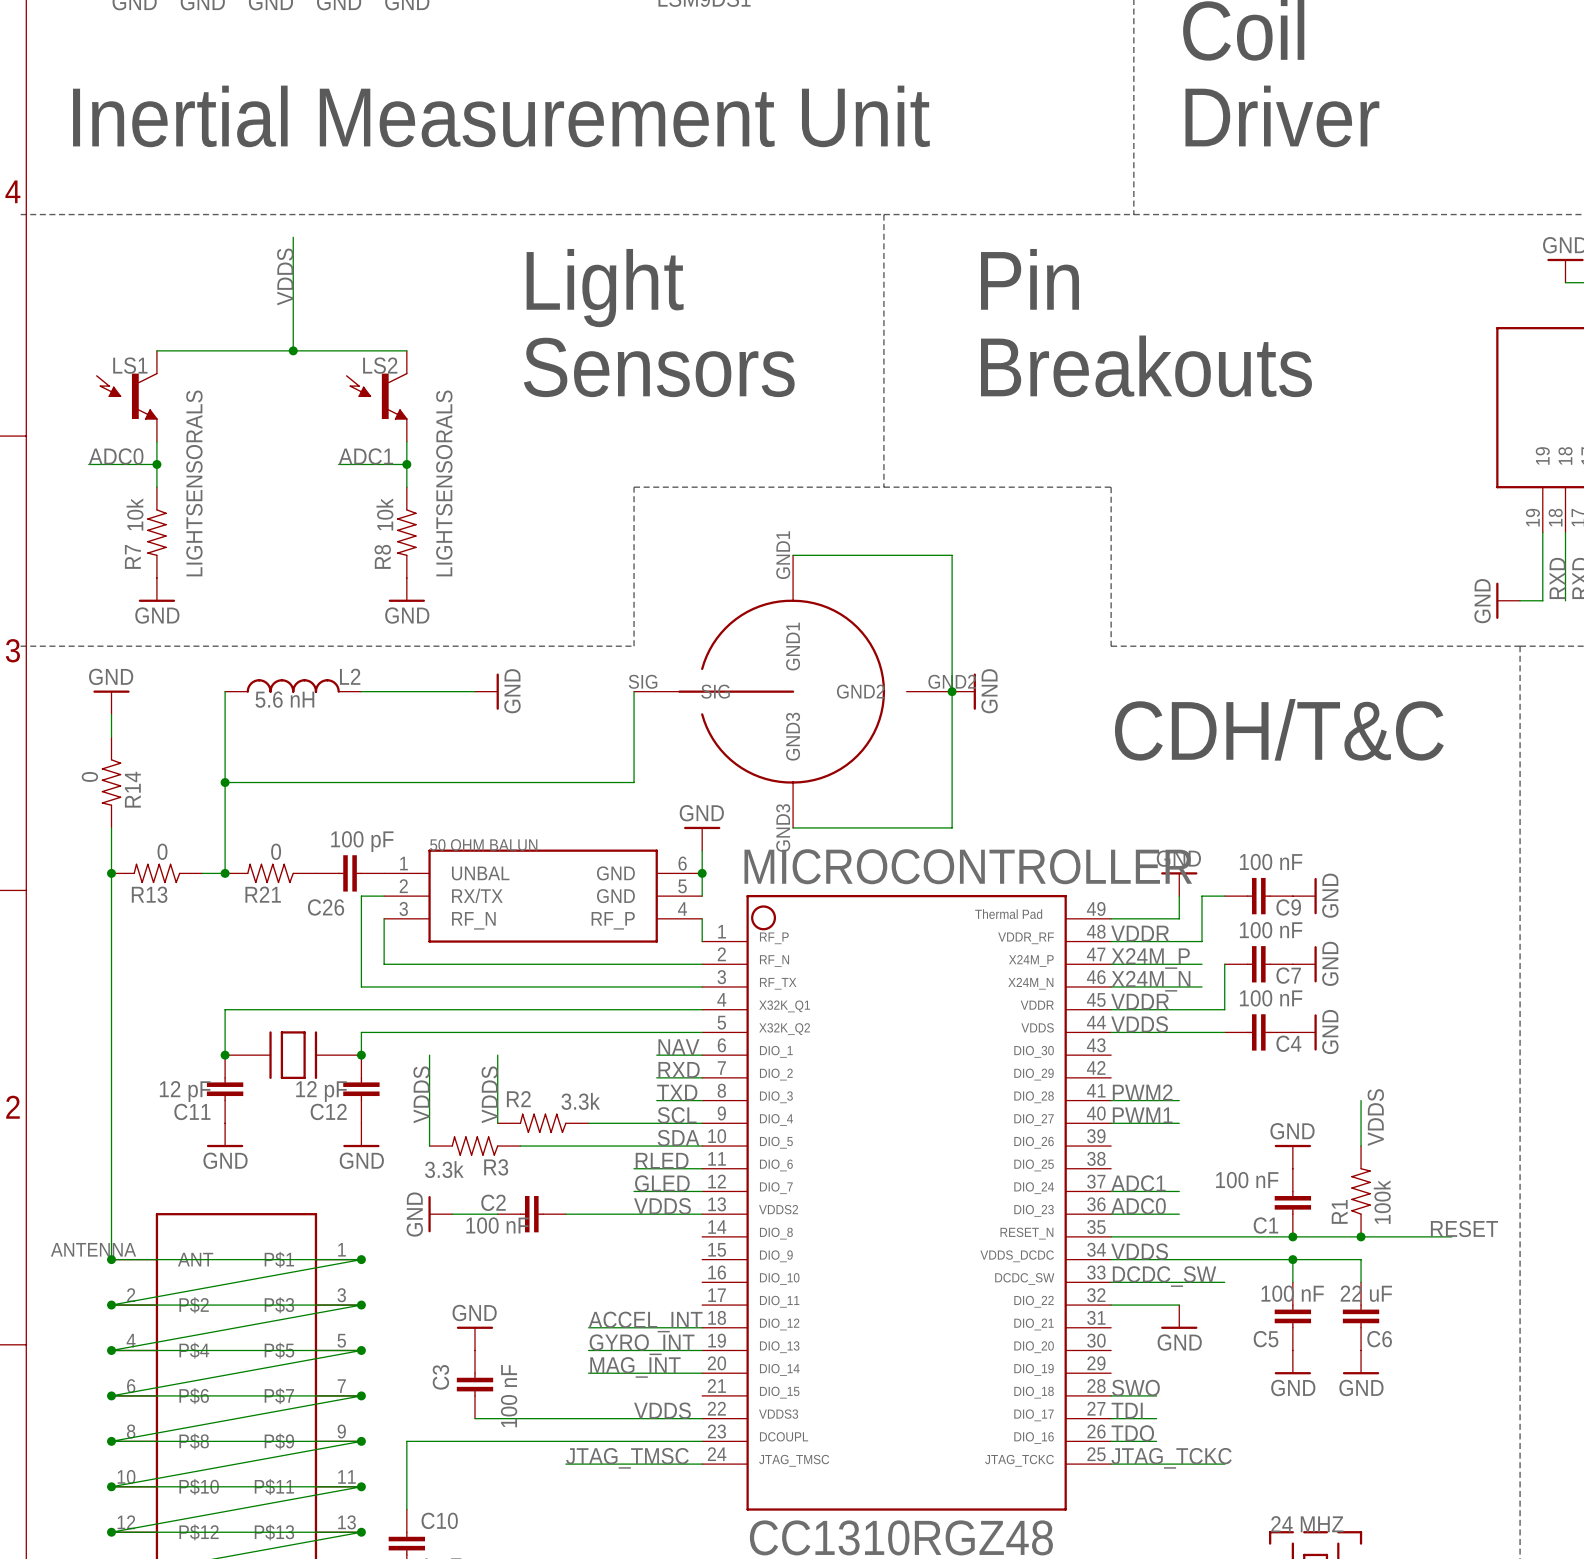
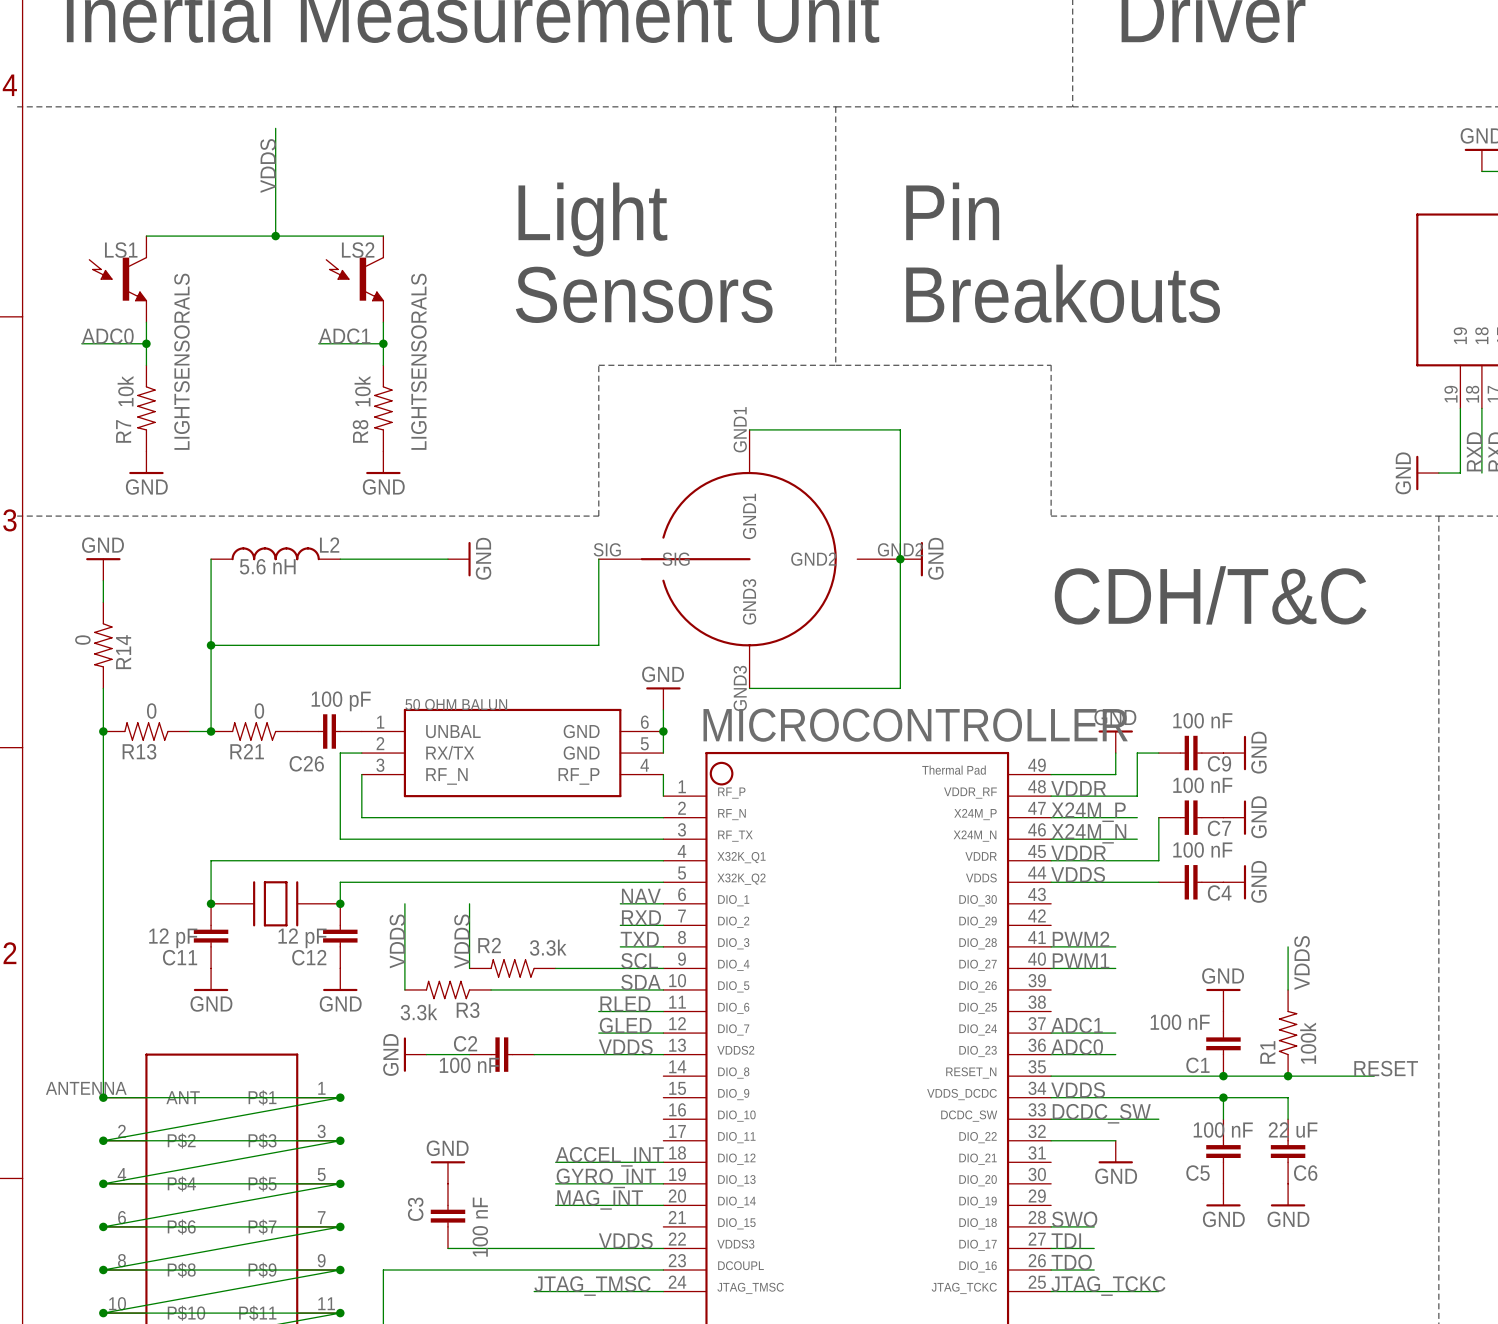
text position: Pin (1030, 279) -> Pin (952, 211)
text position: Light (605, 288) -> Light (592, 219)
text position: Breakouts (1146, 366) -> Breakouts (1063, 293)
text position: Sensors (659, 367) -> Sensors (644, 294)

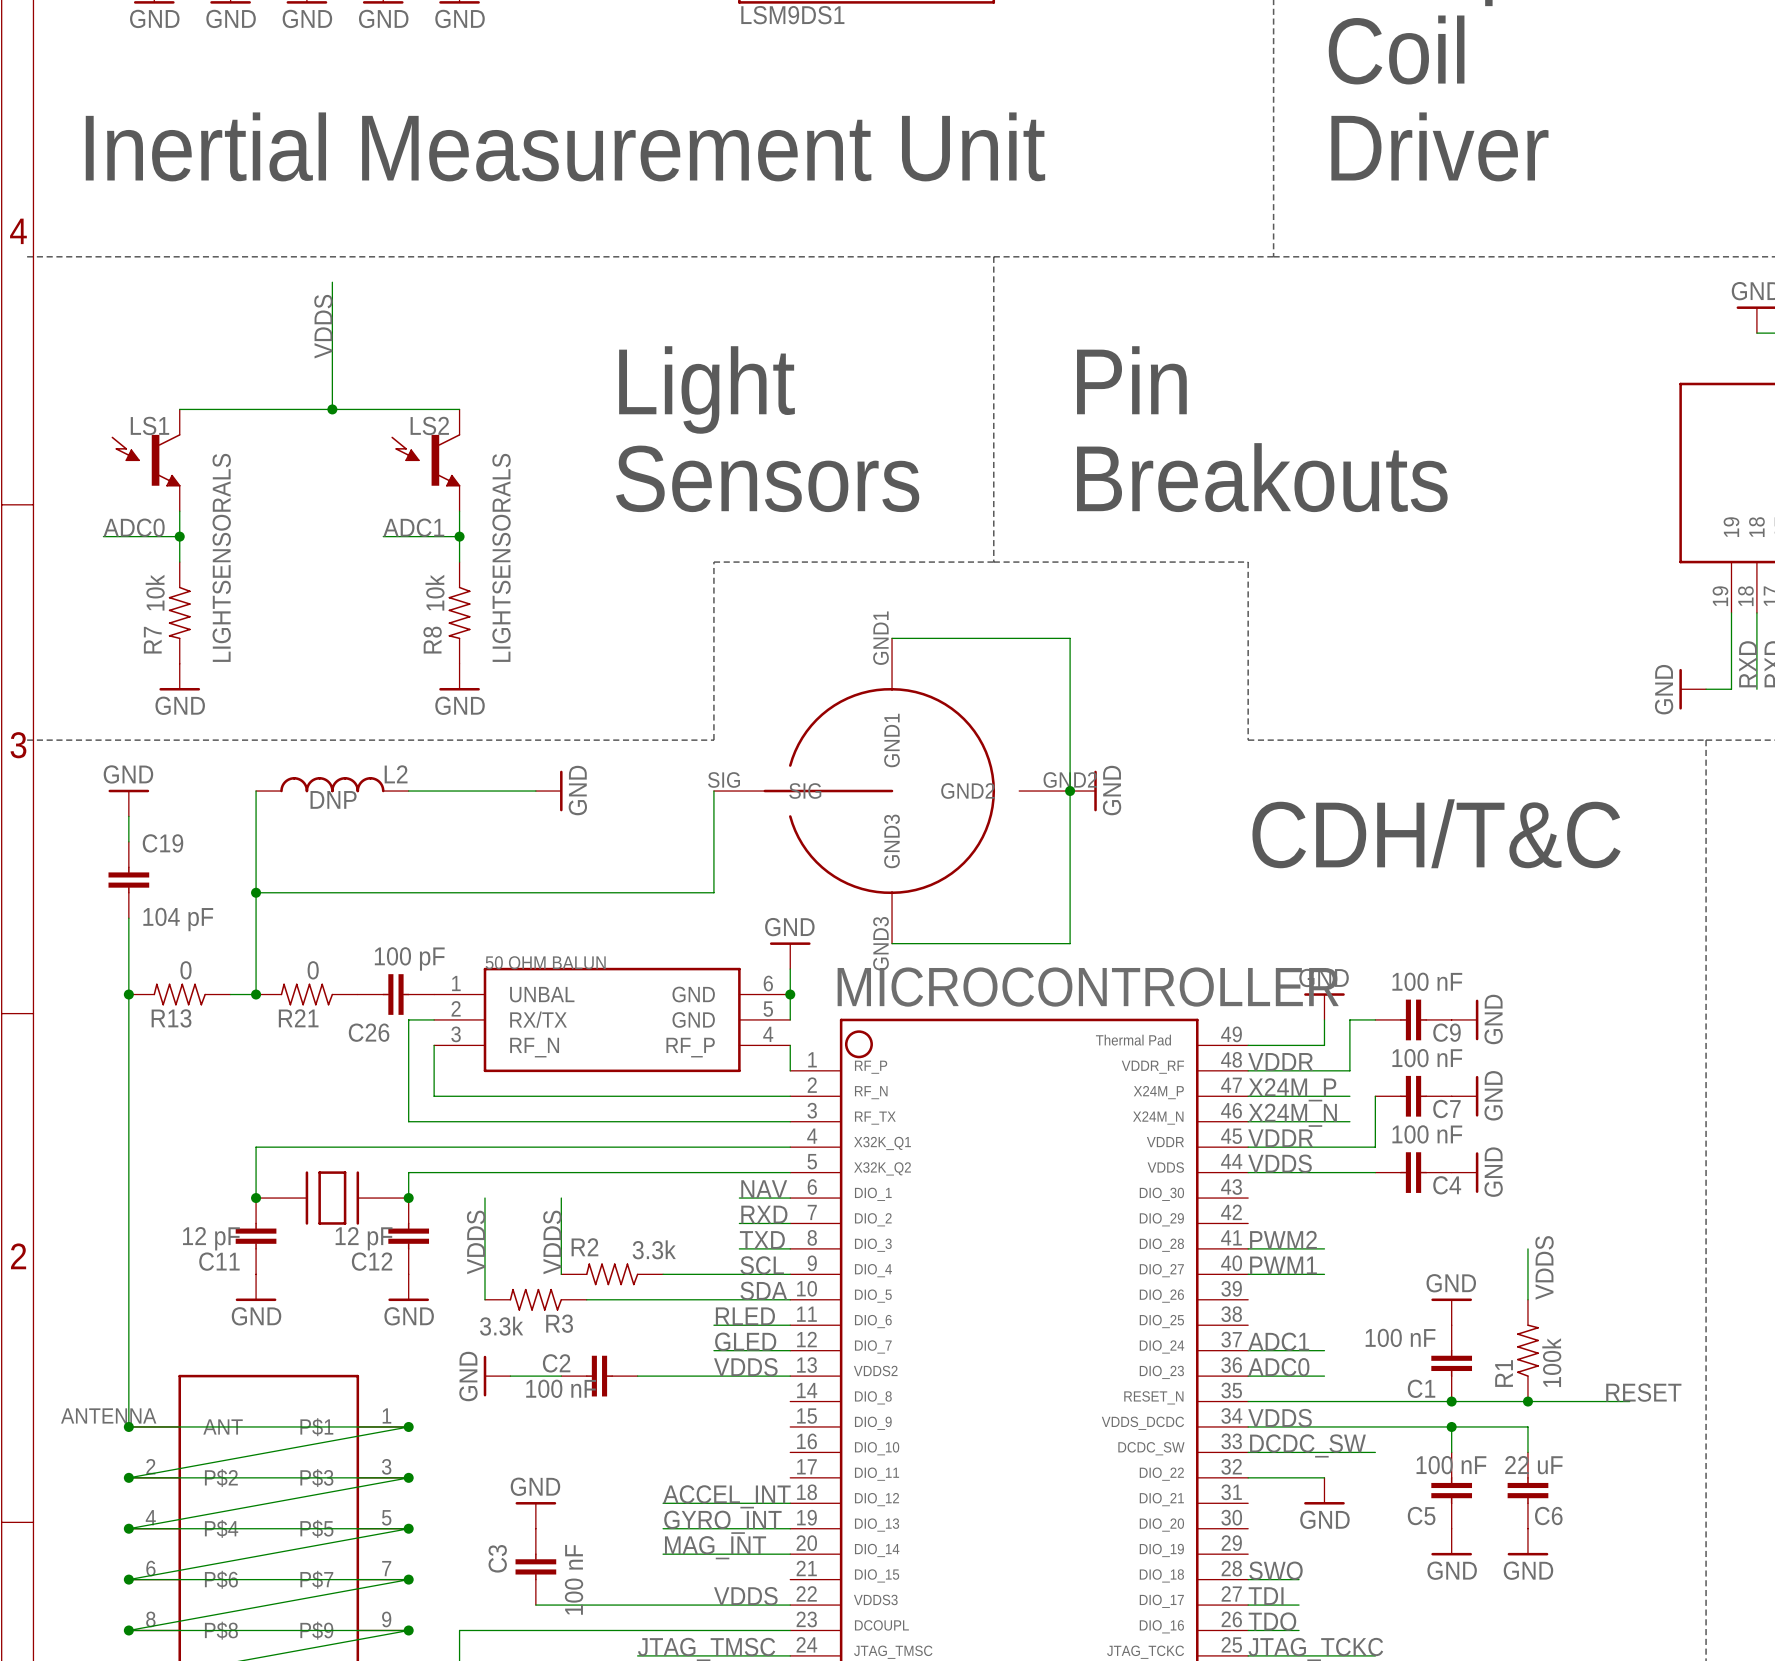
L2 value: 5.6 nH (267, 566) -> DNP (333, 799)
C19: none -> 104 pF (128, 880)
R14: 0 (103, 645) -> none

